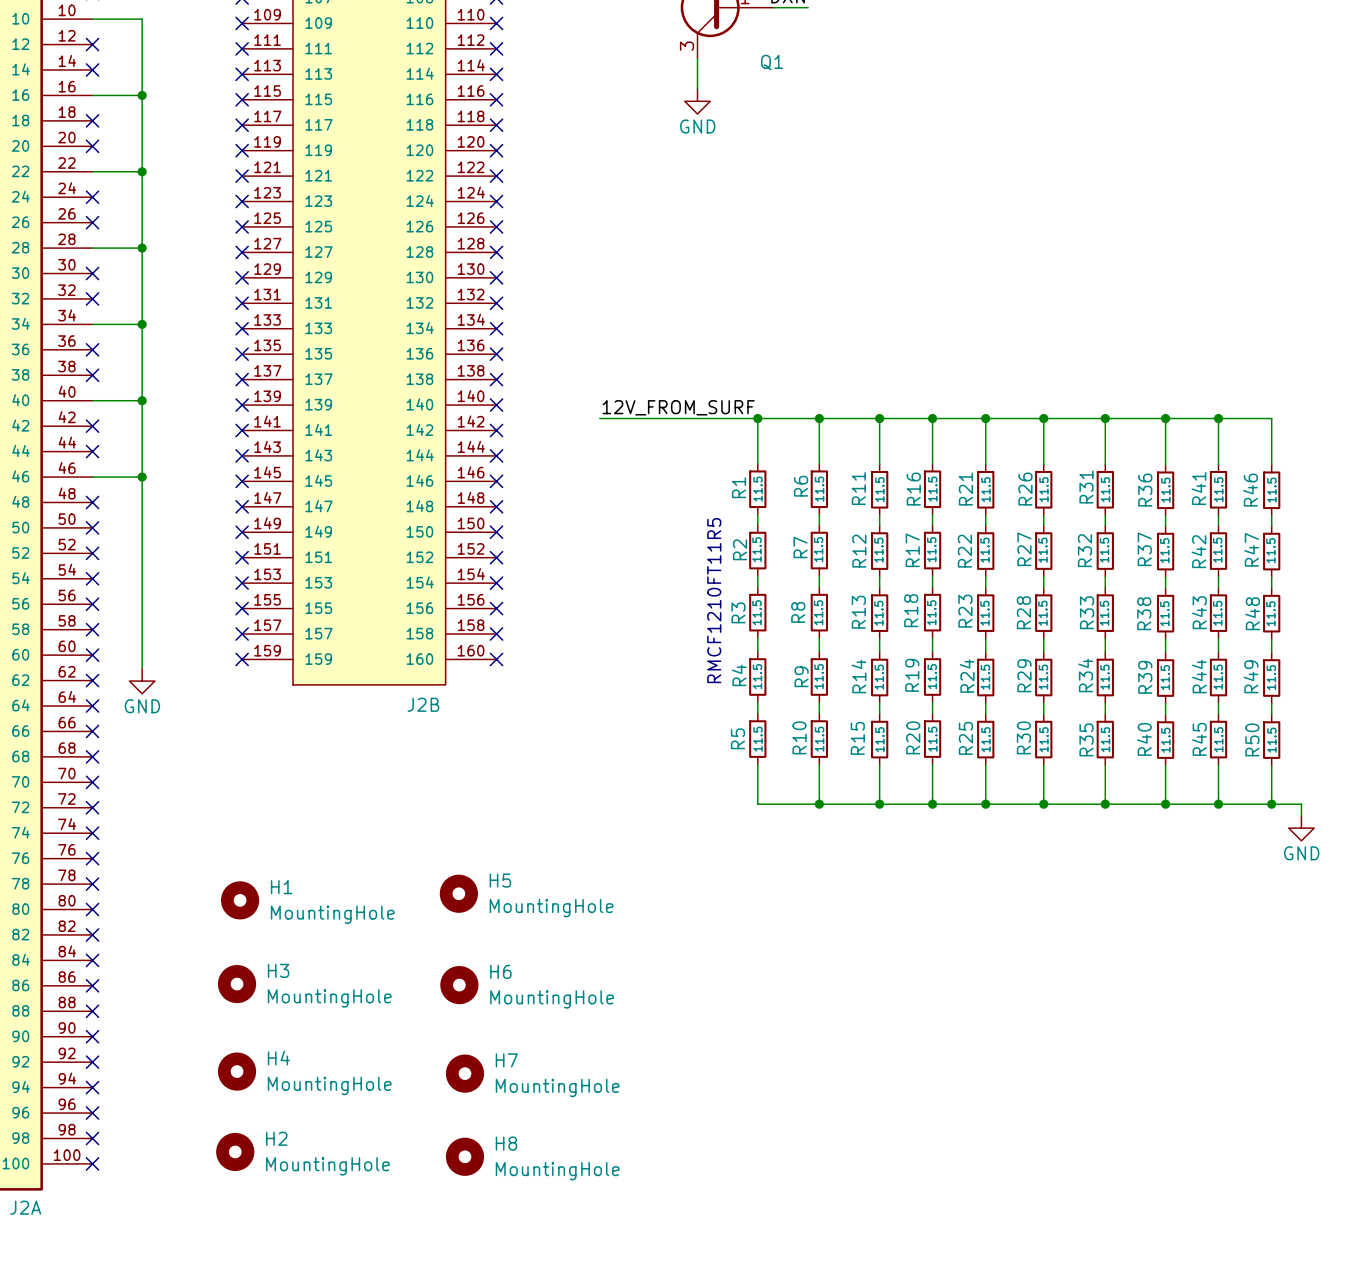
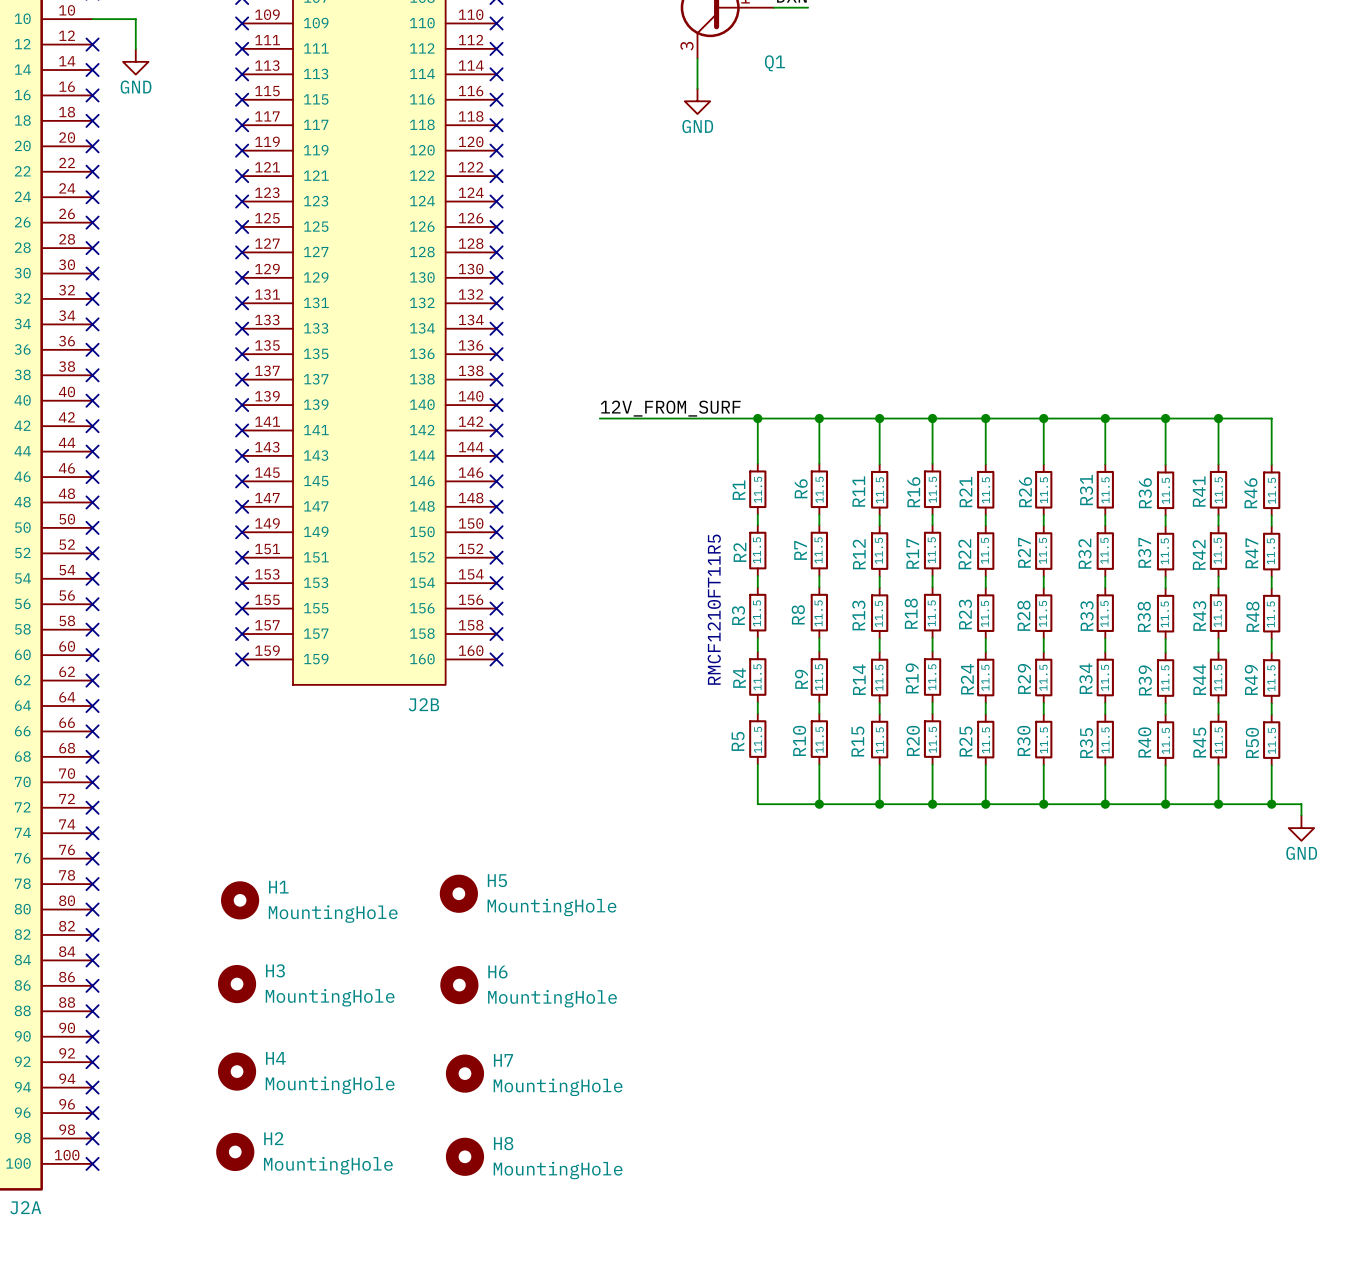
wire: (135, 19) (142, 19) (142, 668) -> (135, 19) (135, 49)
power symbol: none -> GND (135, 61)
wire: (92, 95) (142, 95) -> none
no-connect mark: none -> (92, 95)
junction: (142, 95) -> none
wire: (92, 171) (142, 171) -> none
no-connect mark: none -> (92, 171)
junction: (142, 171) -> none
wire: (92, 248) (142, 248) -> none
no-connect mark: none -> (92, 248)
junction: (142, 248) -> none
wire: (92, 324) (142, 324) -> none
no-connect mark: none -> (92, 324)
junction: (142, 324) -> none
wire: (92, 400) (142, 400) -> none
no-connect mark: none -> (92, 400)
junction: (142, 400) -> none
wire: (92, 477) (142, 477) -> none
no-connect mark: none -> (92, 477)
junction: (142, 477) -> none
power symbol: GND (142, 681) -> none

